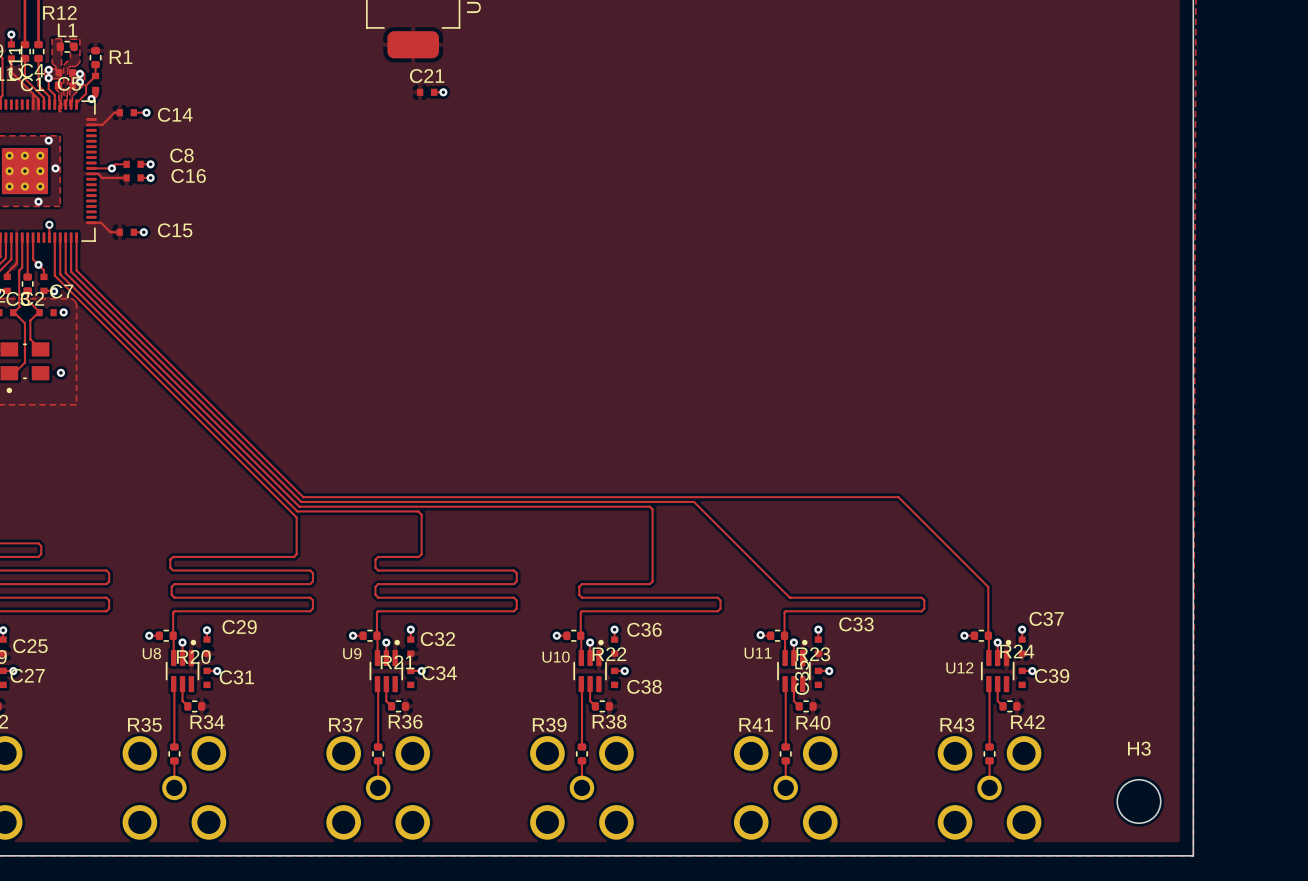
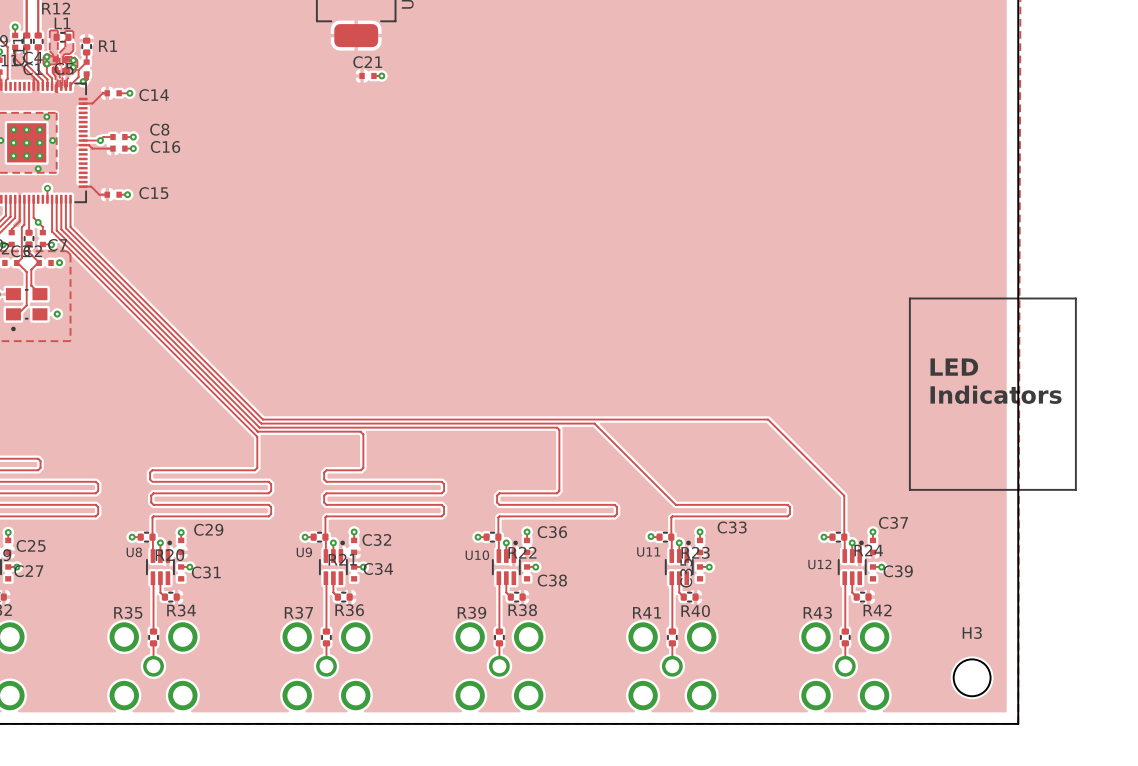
line: none -> (909, 298) (1075, 298) (1075, 489) (909, 489) (909, 298)
text: none -> LED (954, 367)
text: none -> Indicators (996, 394)

